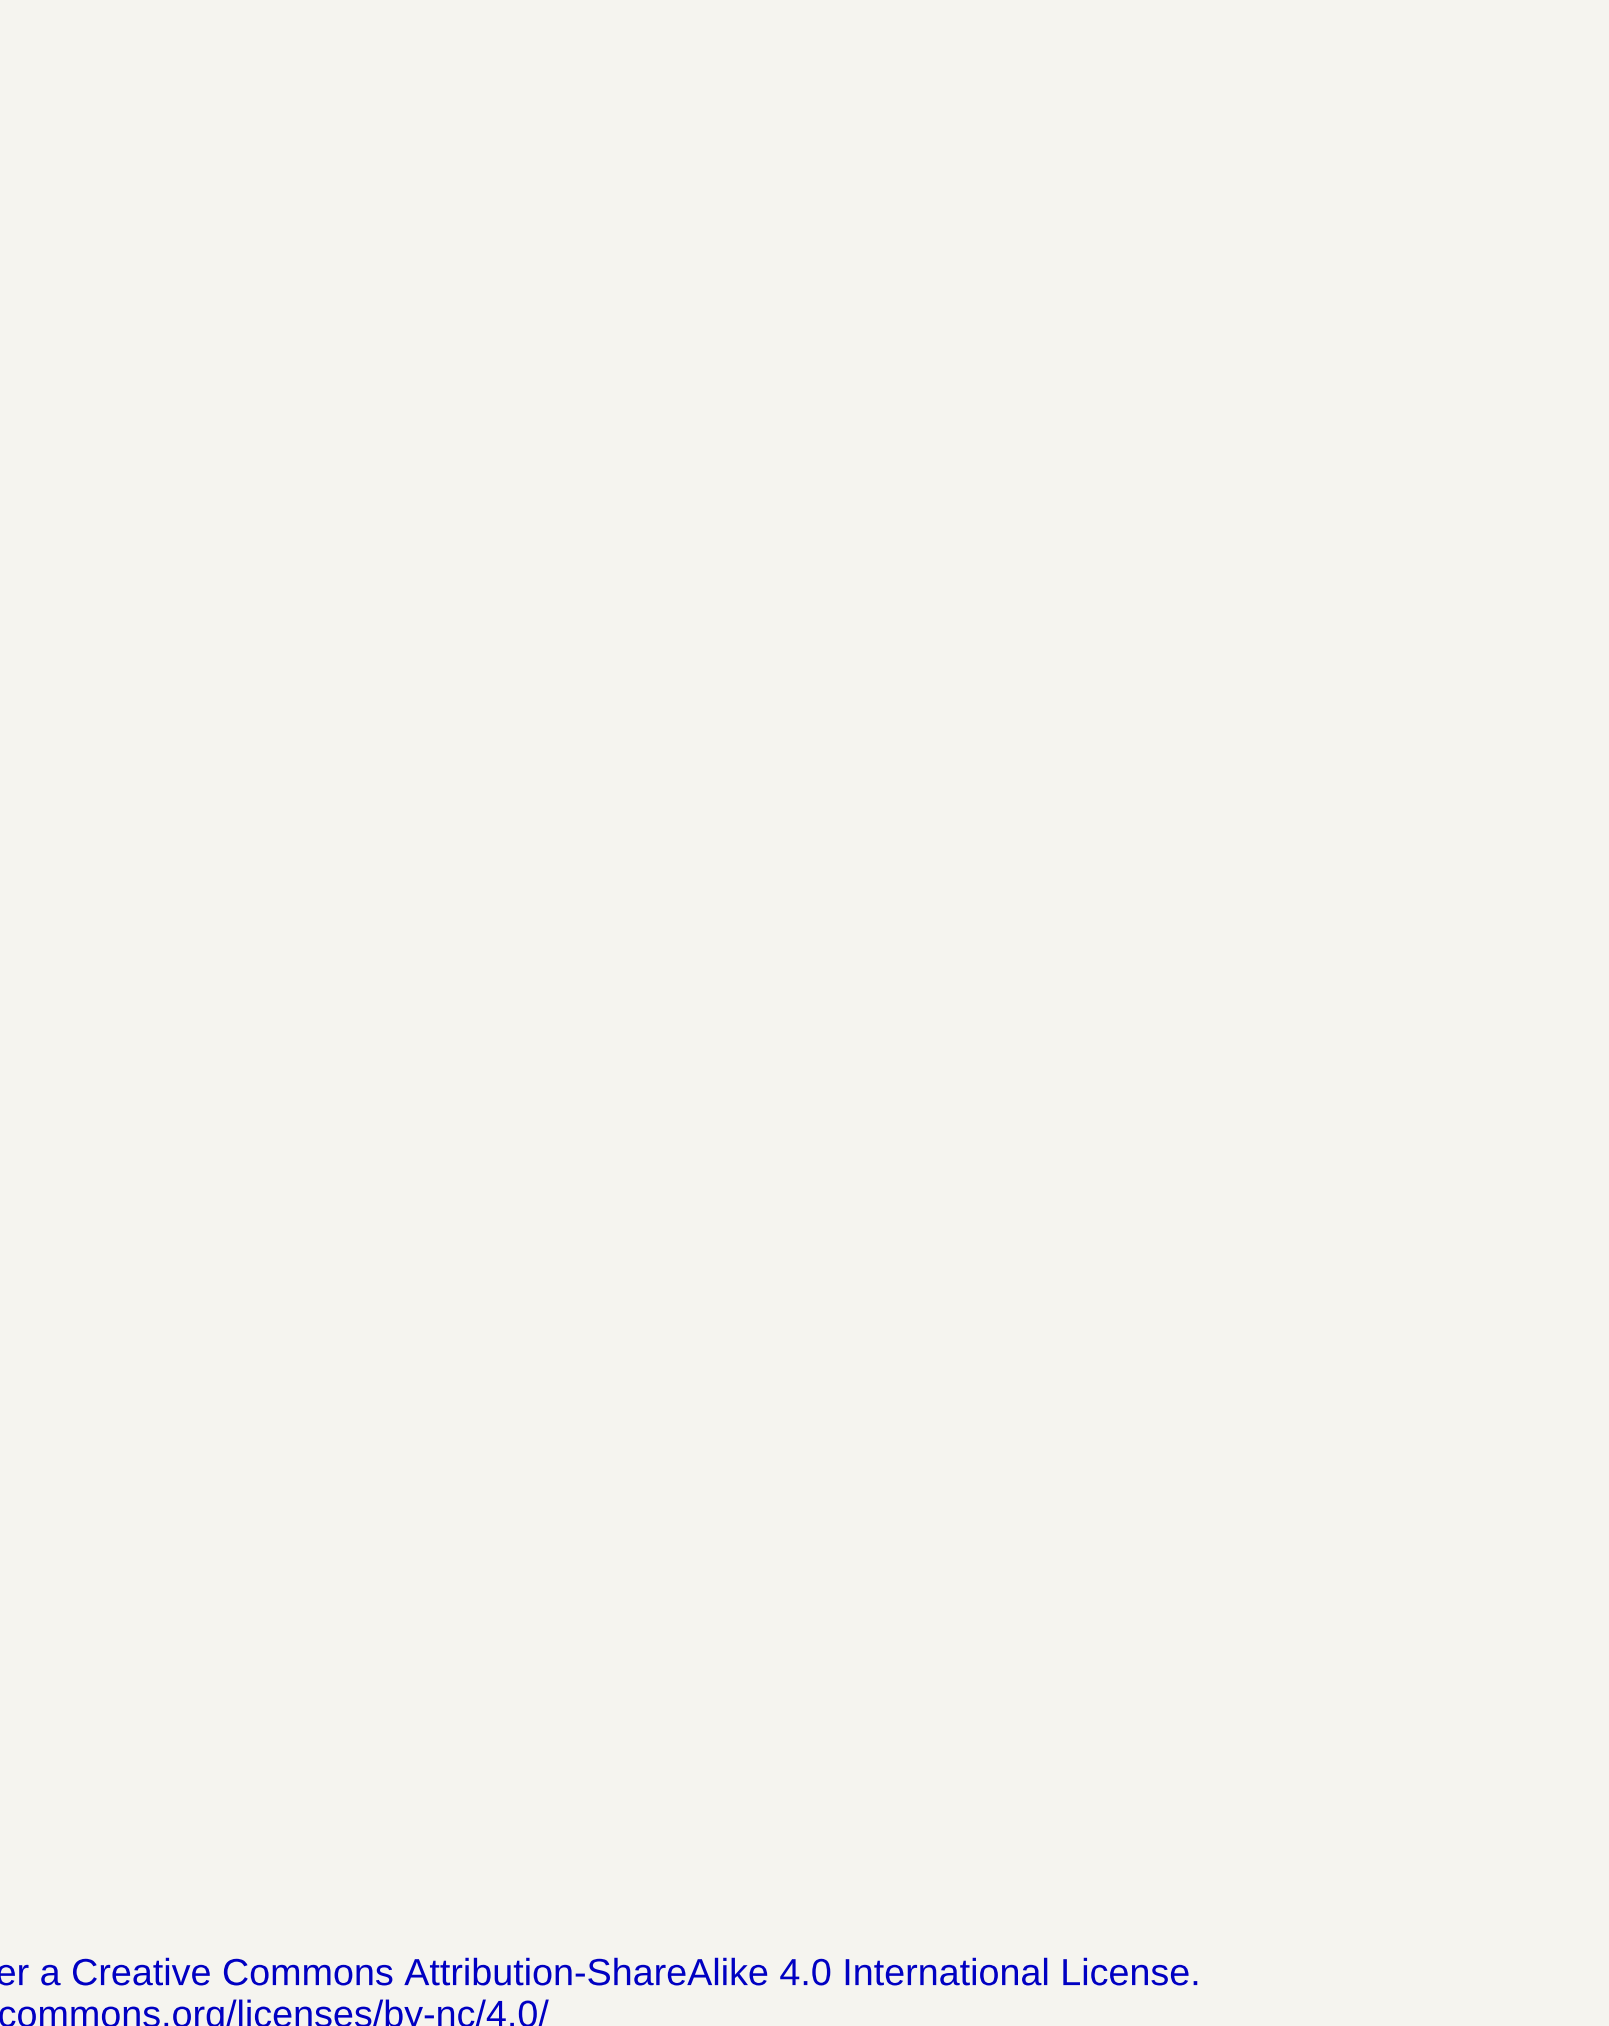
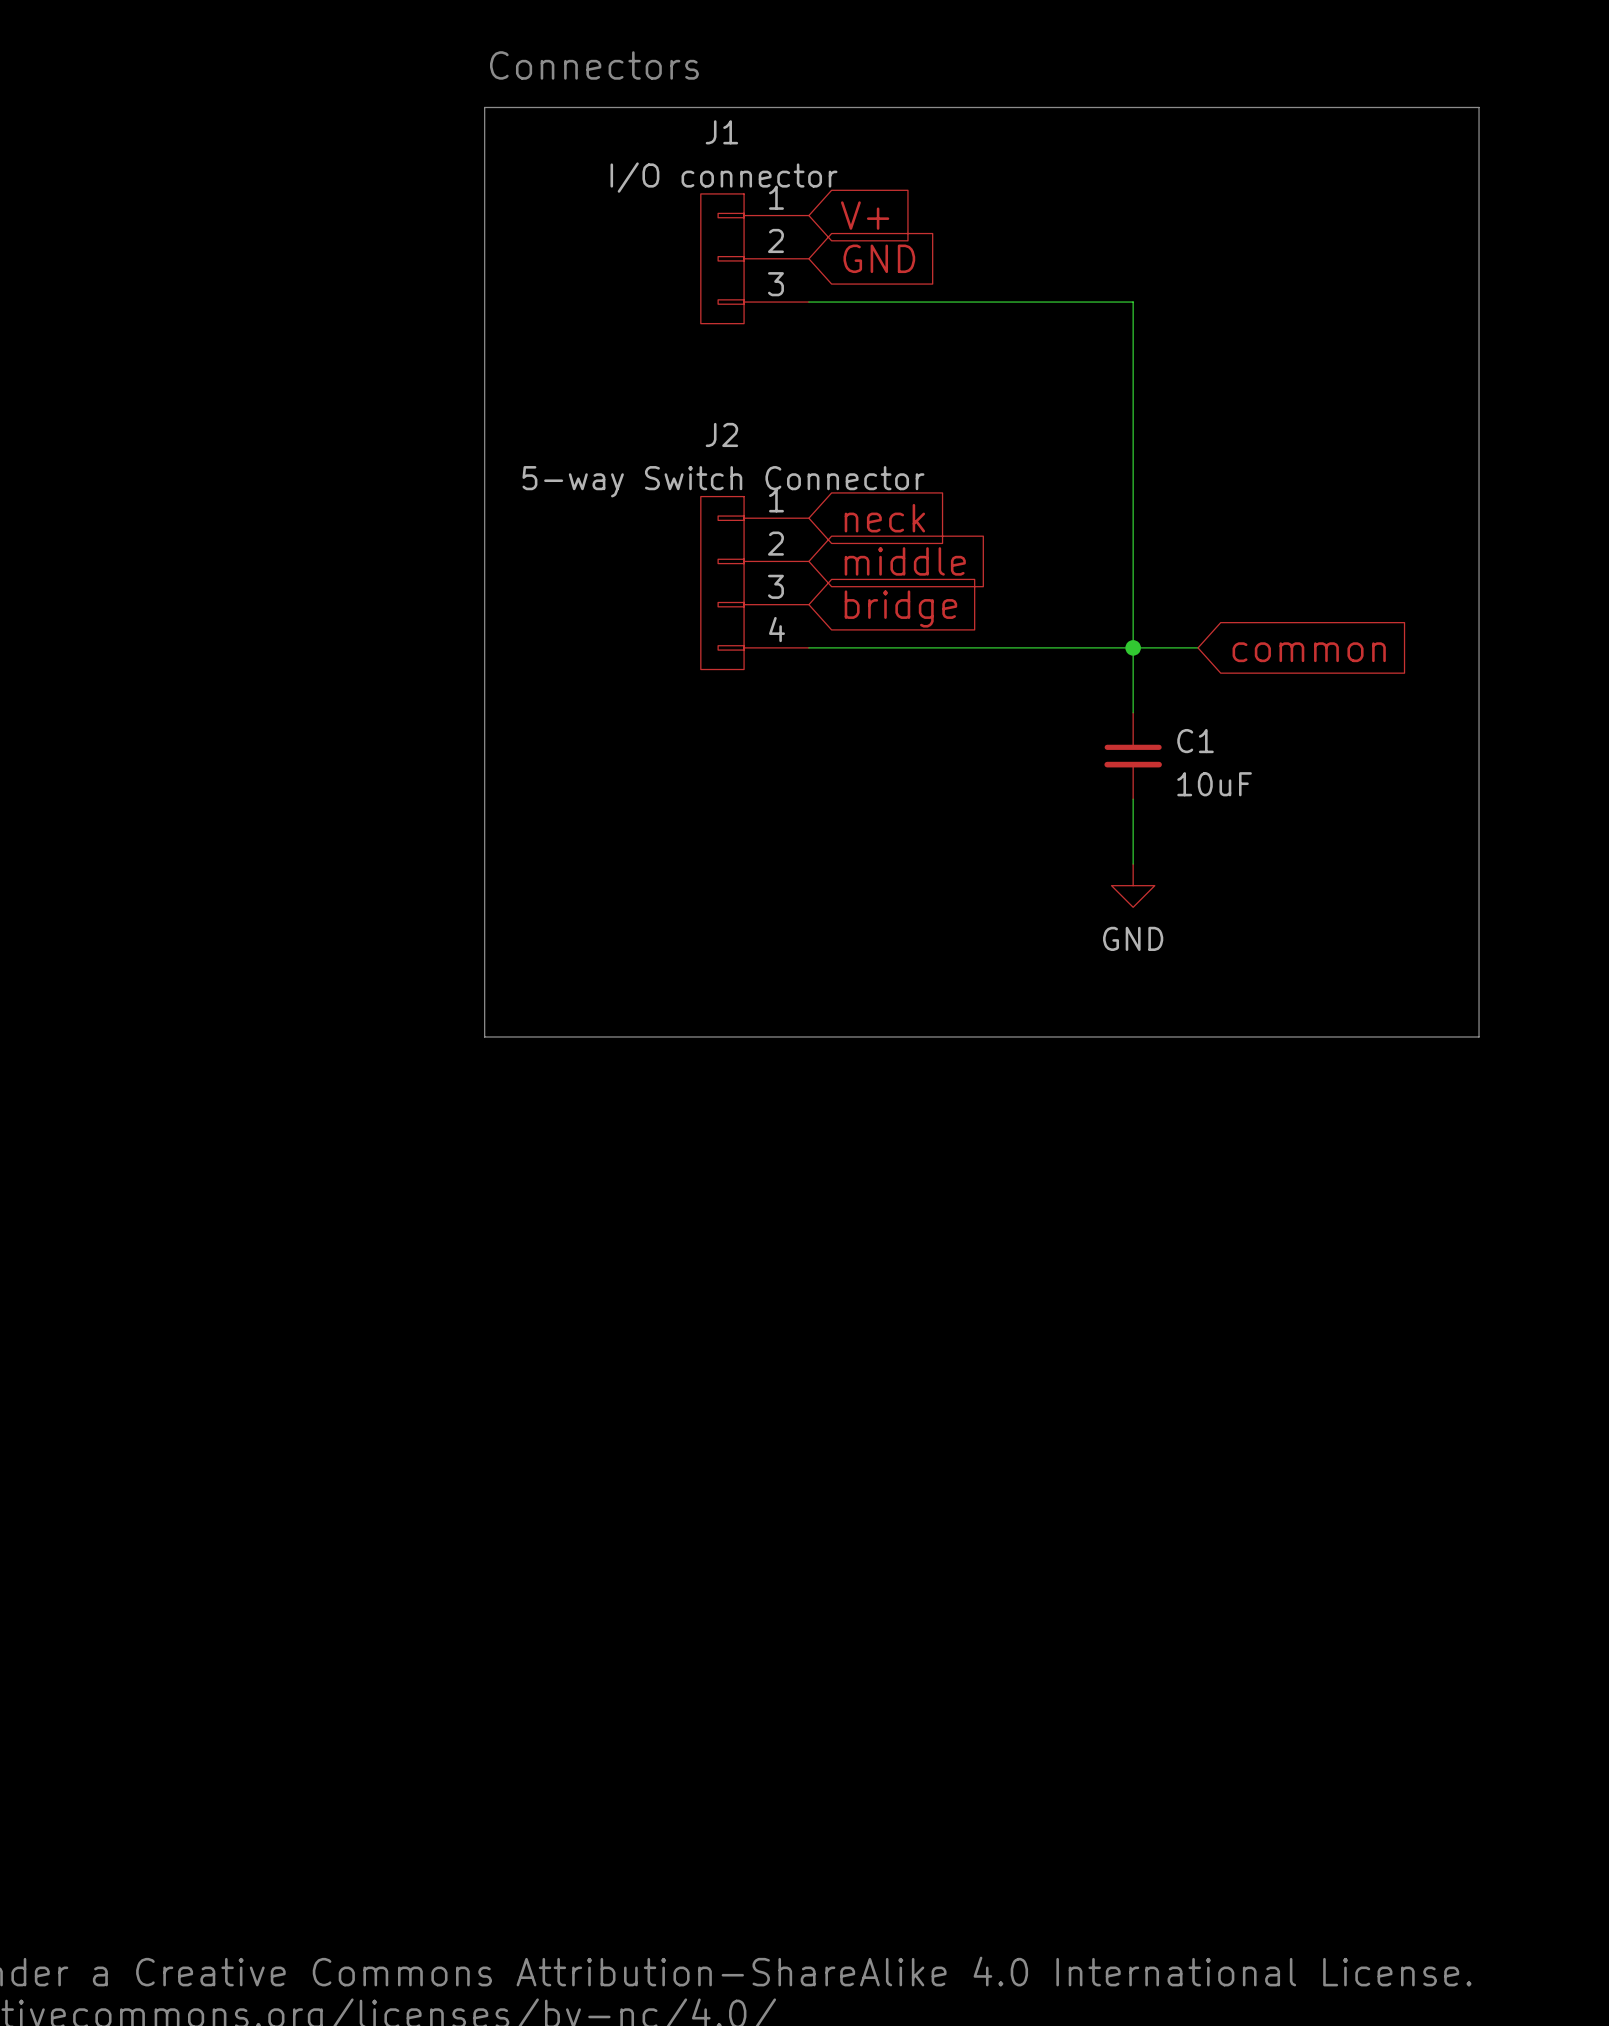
text: none -> Connectors (594, 65)
line: none -> (484, 107) (1479, 107) (1479, 1036) (484, 1036) (484, 107)
global label: none -> V+ (865, 215)
J1: none -> I/O connector (754, 258)
global label: none -> GND (879, 258)
wire: none -> (808, 302) (1133, 302) (1133, 712)
global label: none -> neck (884, 518)
global label: none -> middle (905, 561)
J2: none -> 5-way Switch Connector (754, 583)
global label: none -> bridge (900, 608)
wire: none -> (808, 647) (1198, 647)
junction: none -> (1133, 647)
global label: none -> common (1309, 652)
C1: none -> 10uF (1133, 755)
wire: none -> (1133, 799) (1133, 864)
power symbol: none -> GND (1133, 885)

